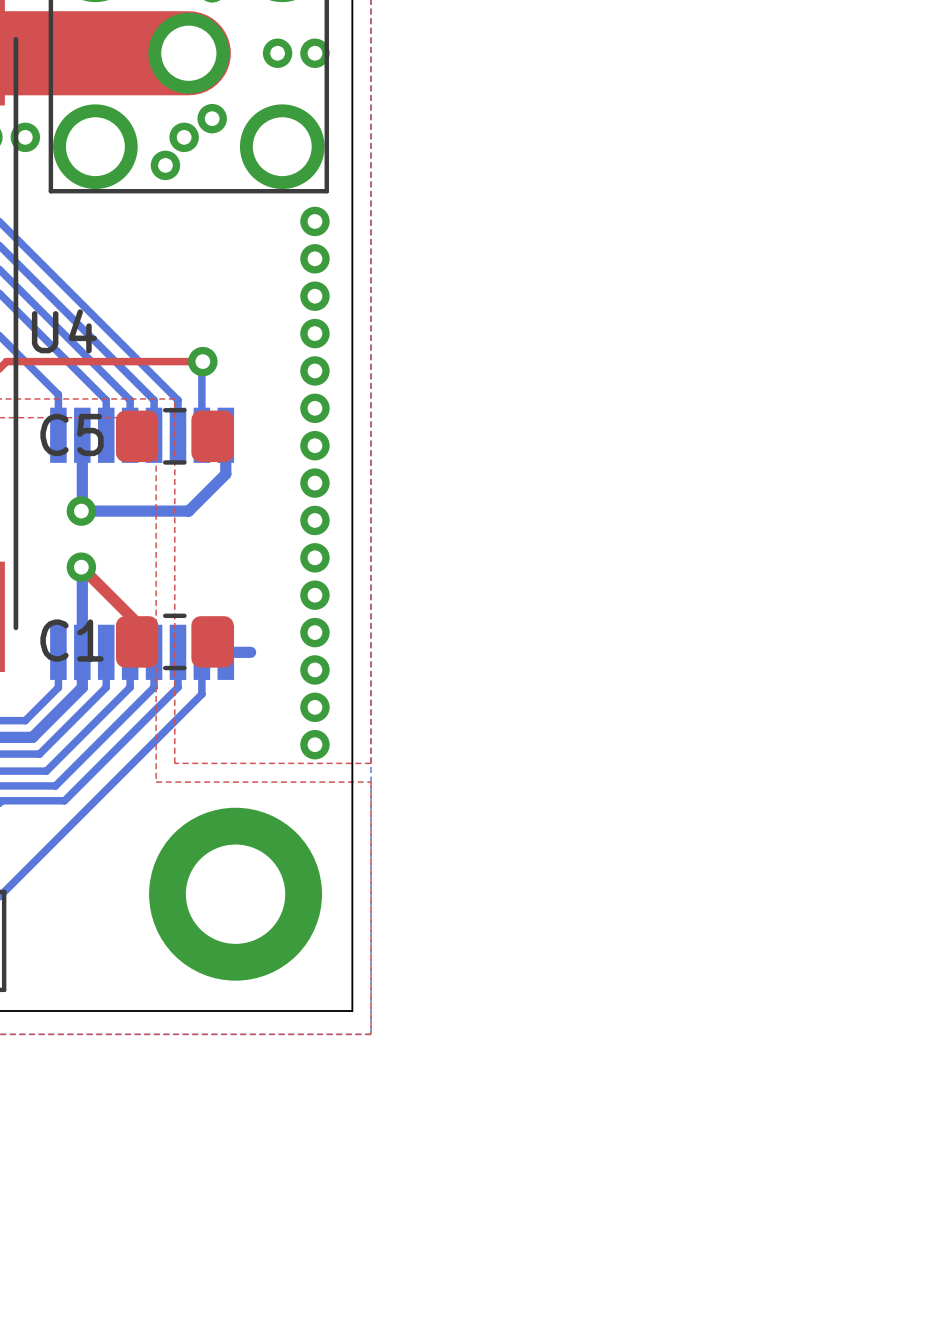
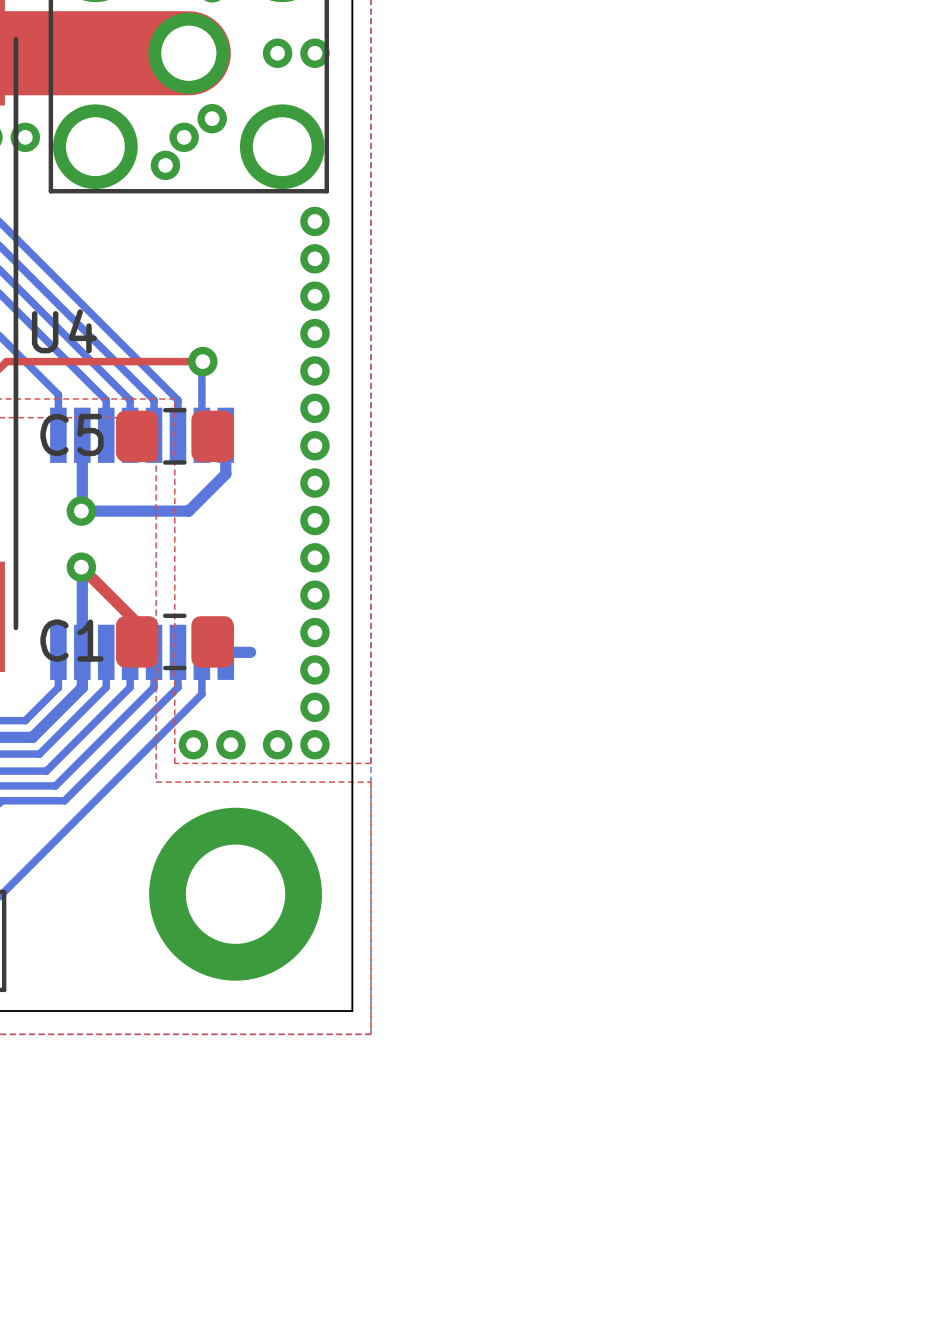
via: none -> (193, 744)
via: none -> (230, 744)
via: none -> (277, 744)

